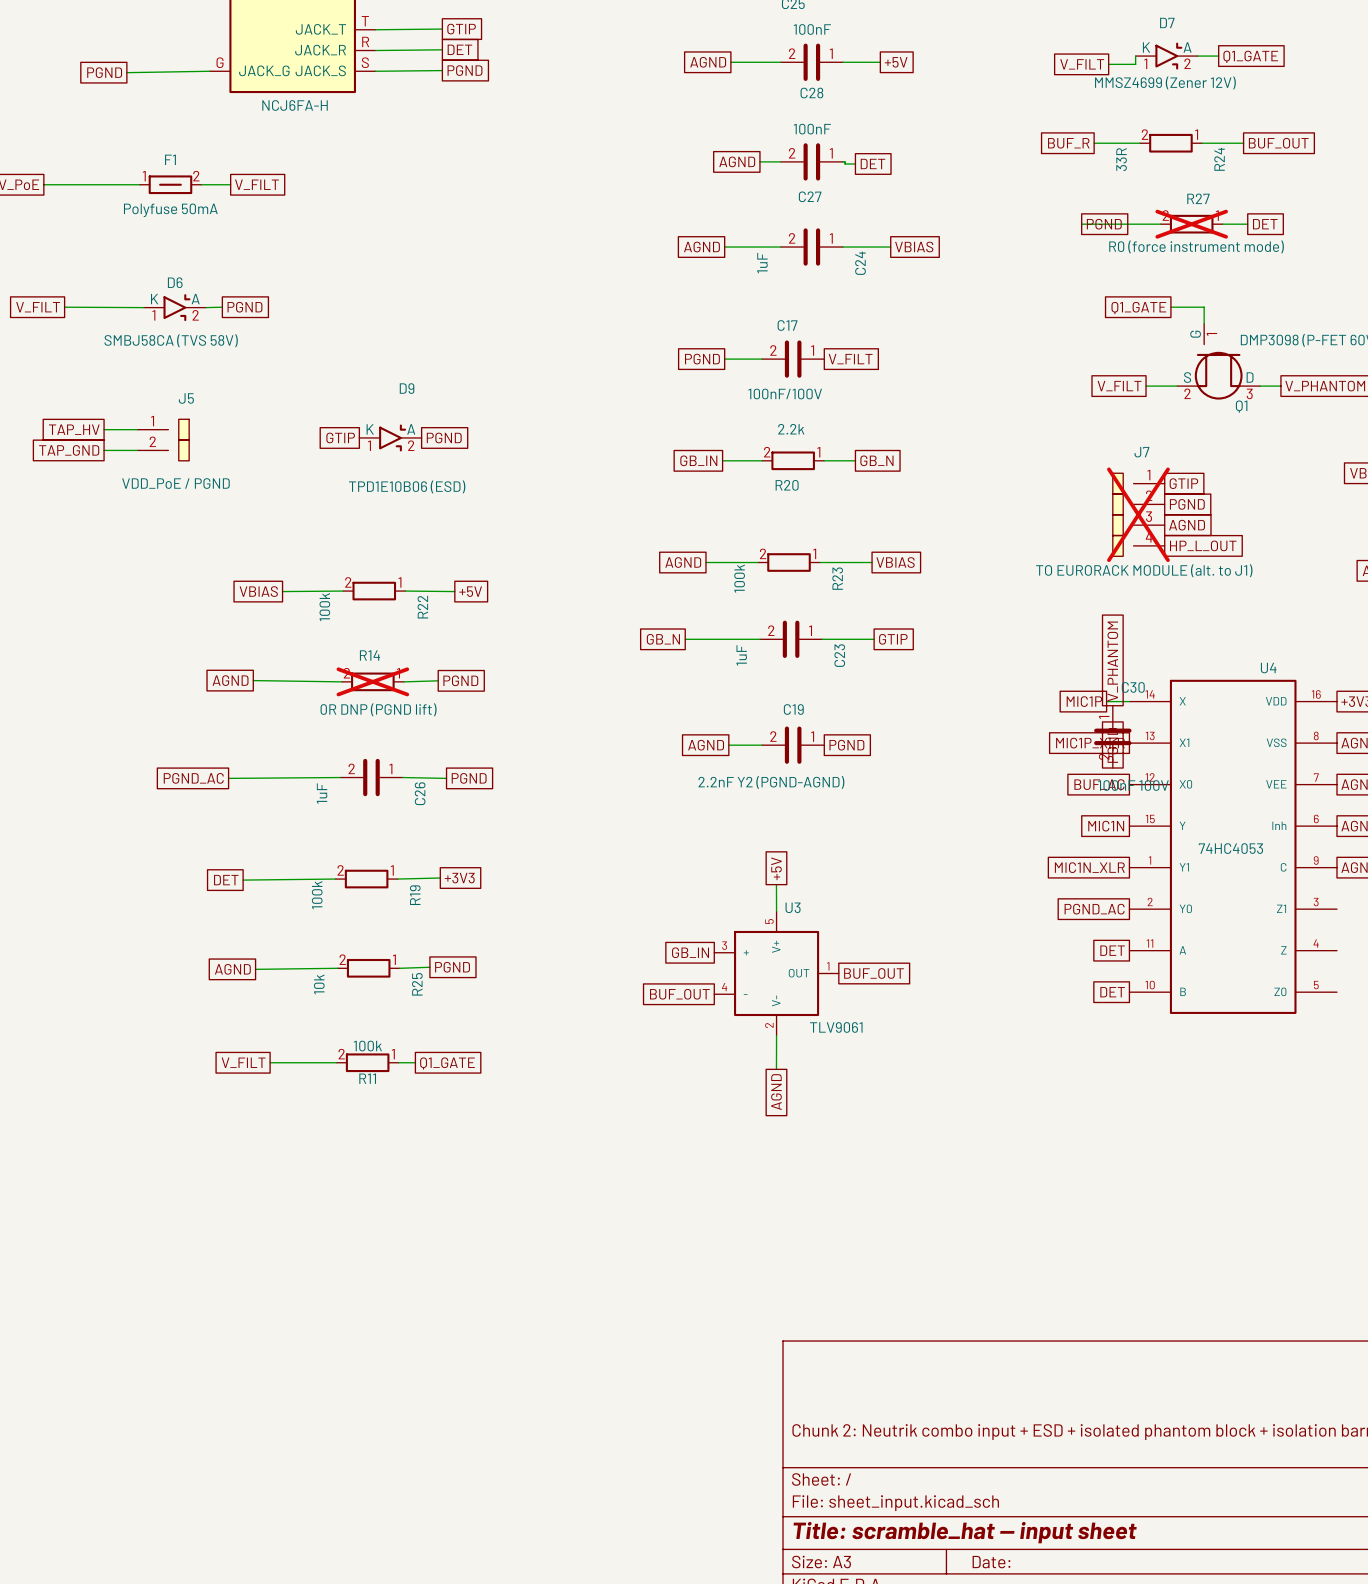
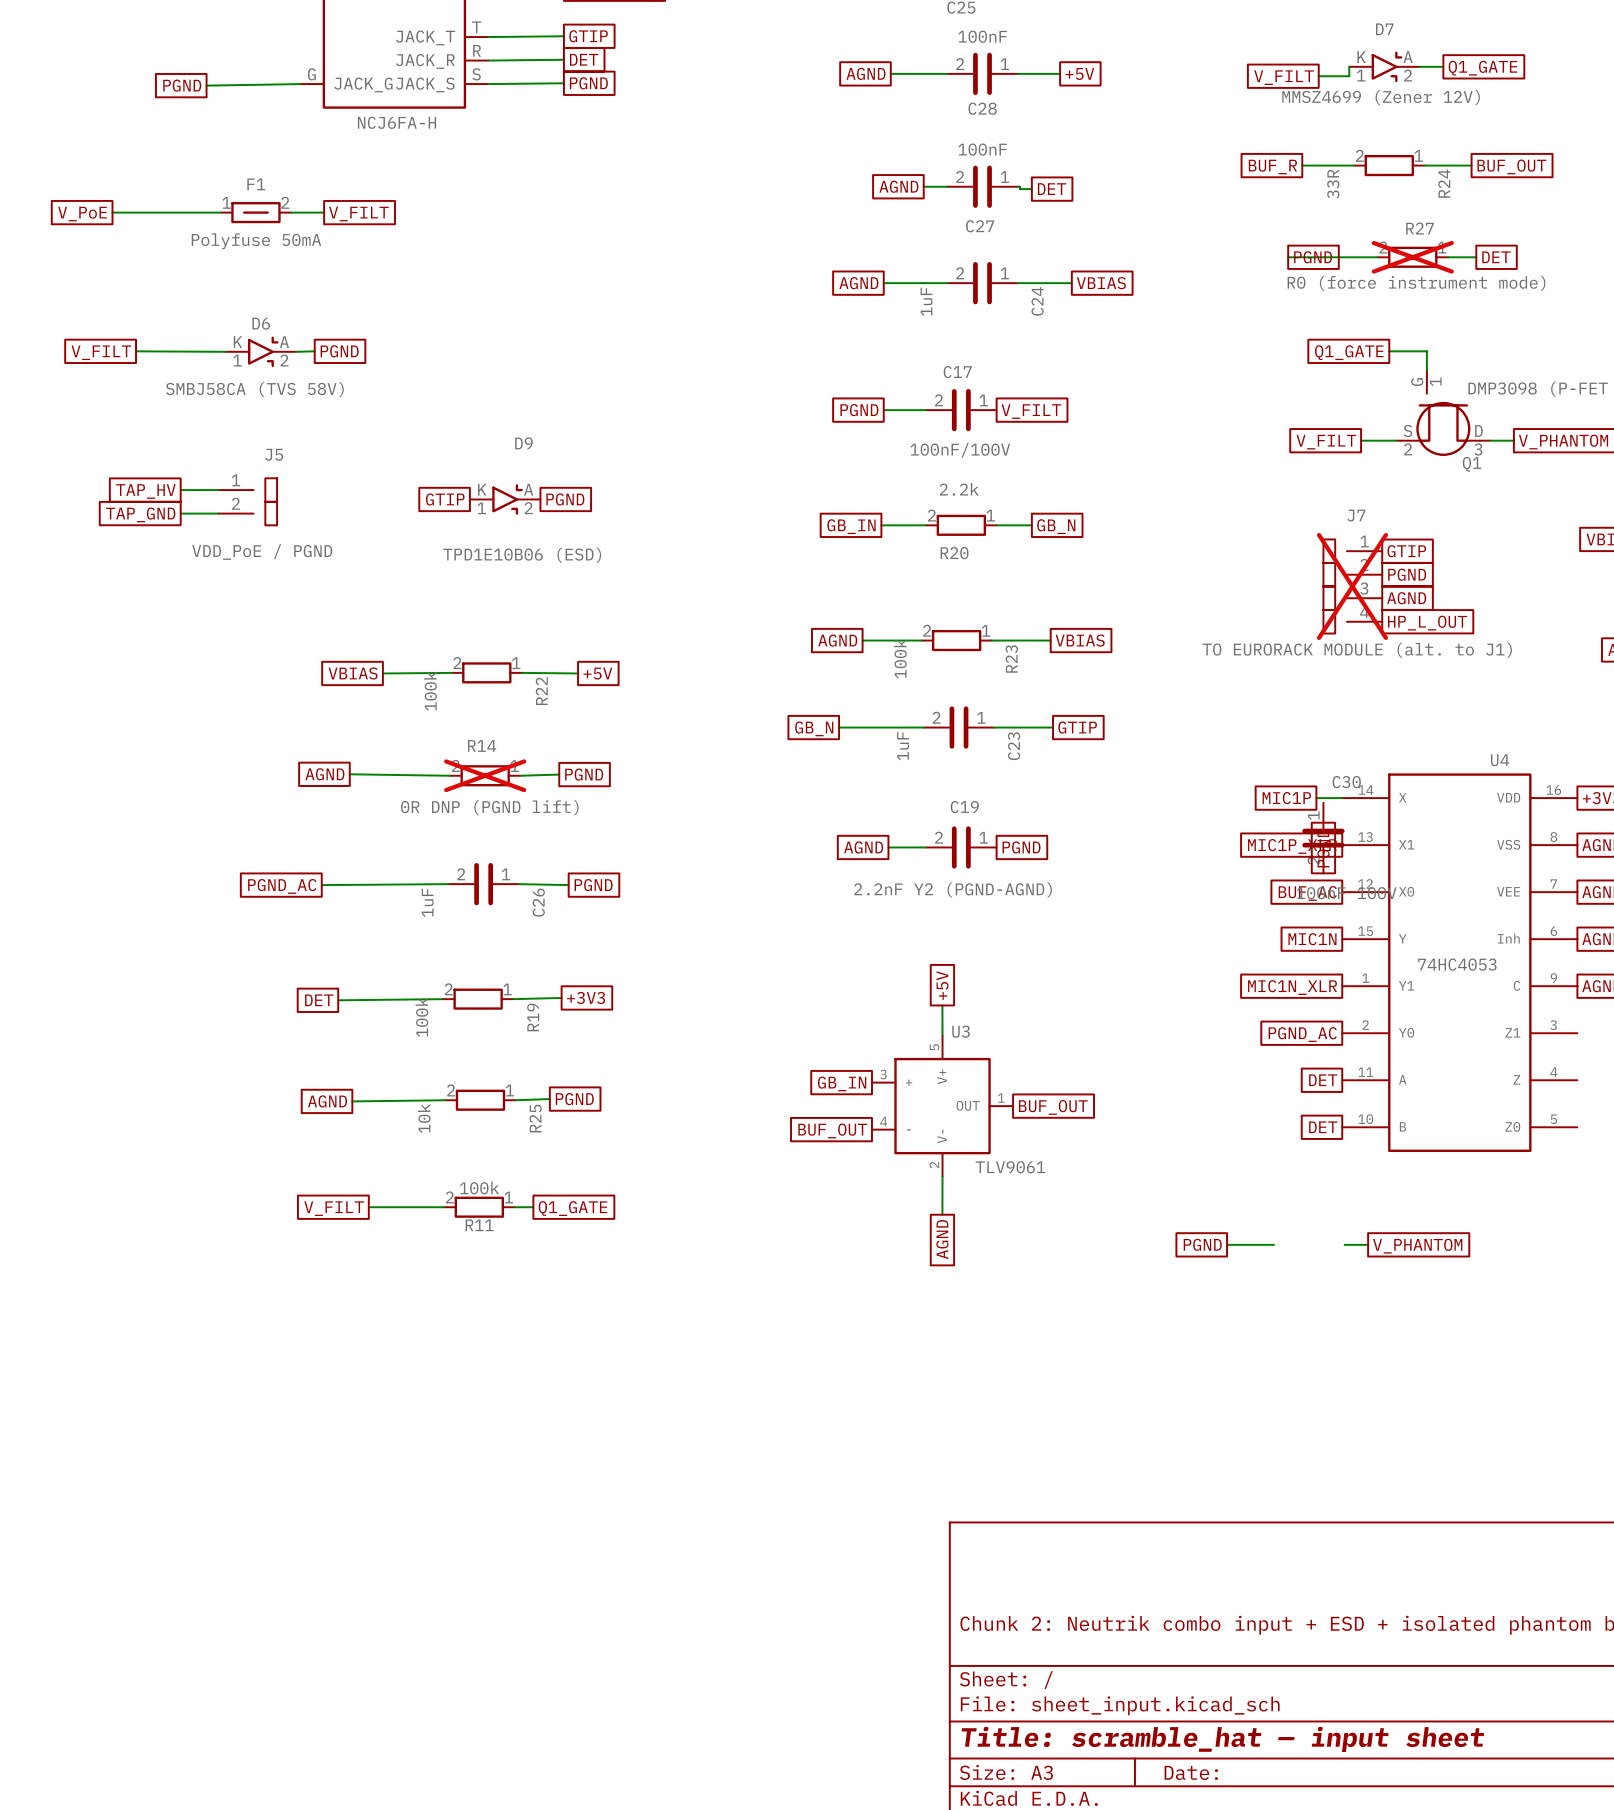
global label: V_PHANTOM (1112, 661) -> none
global label: none -> PGND (1202, 1244)
wire: none -> (1227, 1244) (1274, 1244)
wire: none -> (1344, 1244) (1368, 1244)
global label: none -> V_PHANTOM (1417, 1246)

